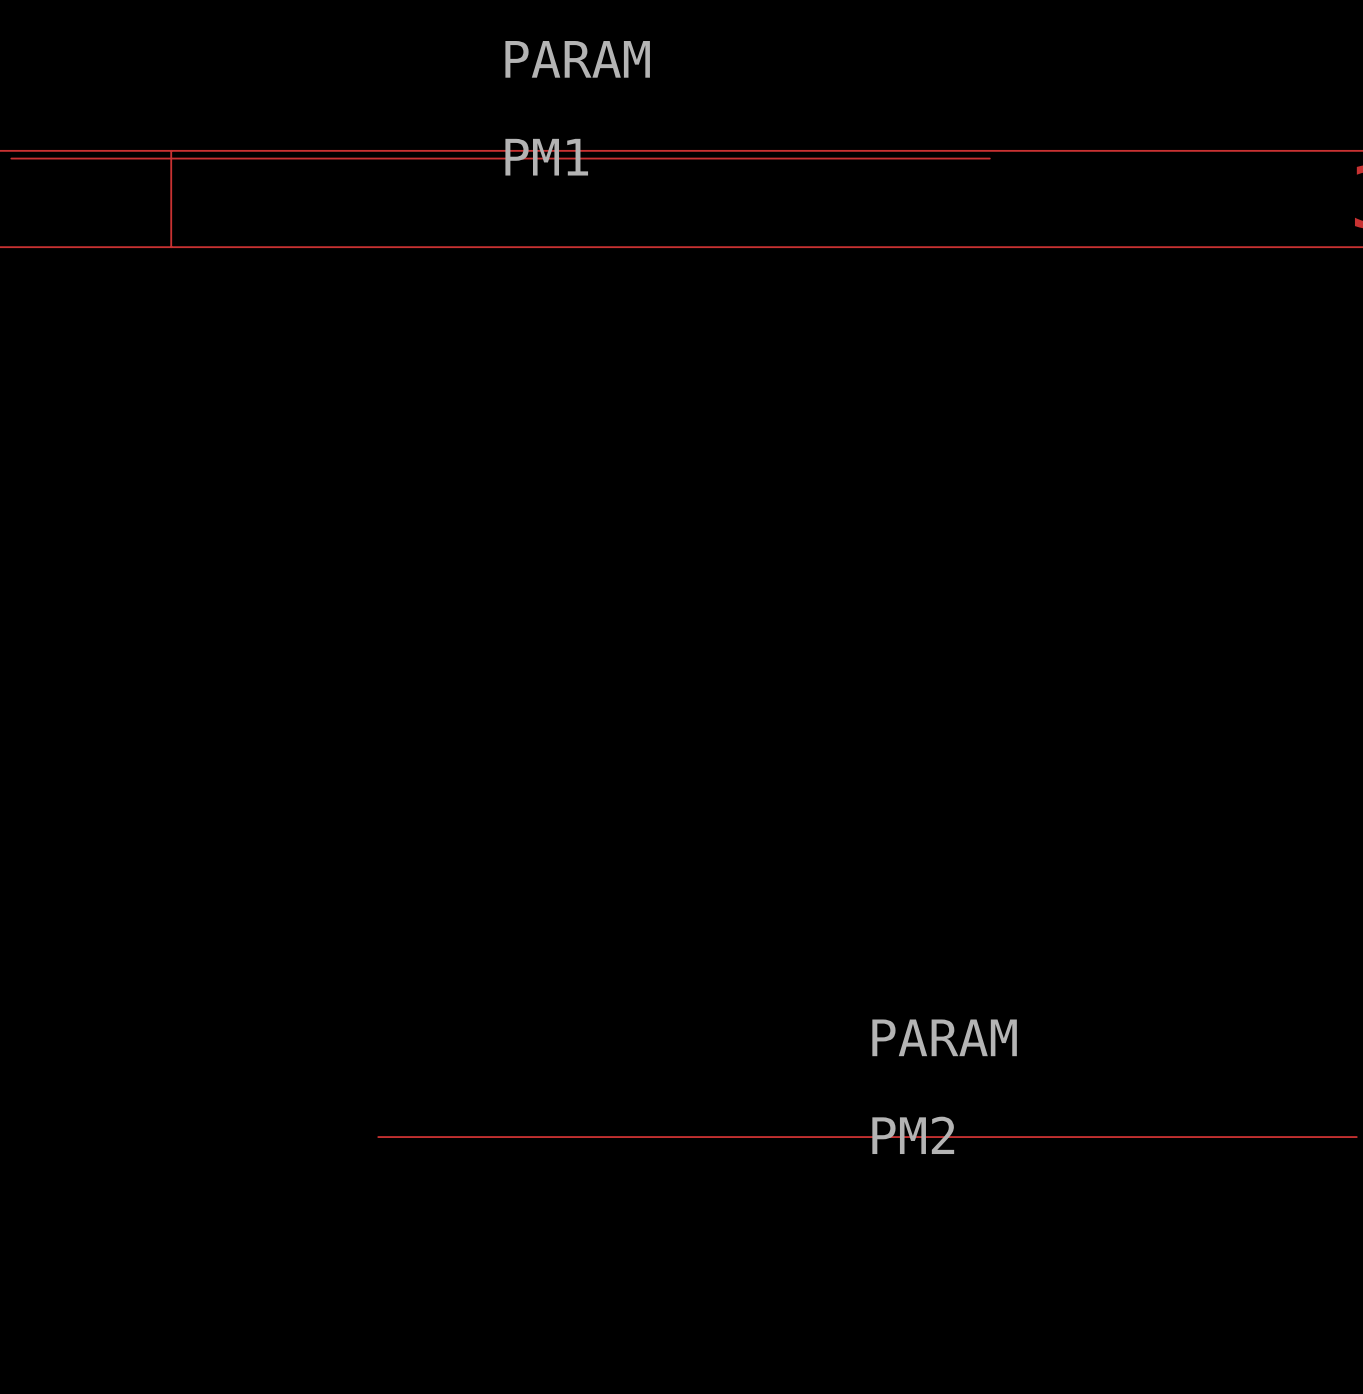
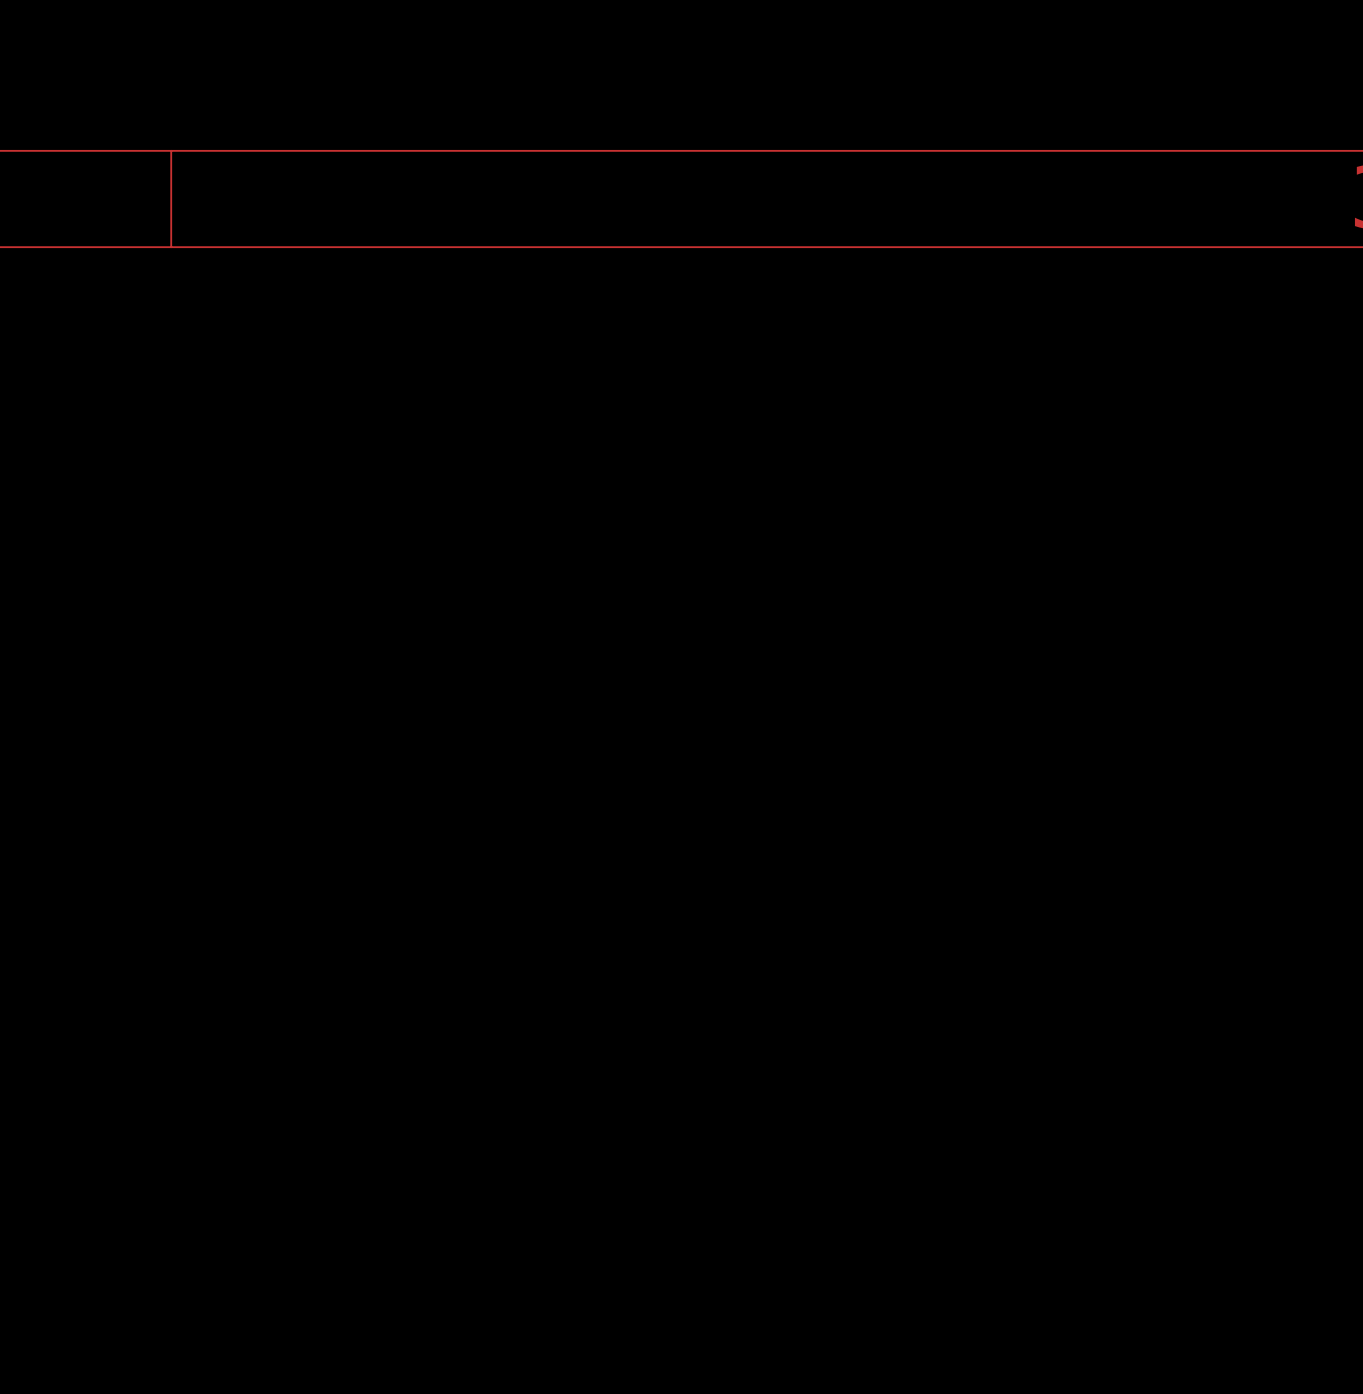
PM1: PARAM (500, 158) -> none
PM2: PARAM (867, 1137) -> none

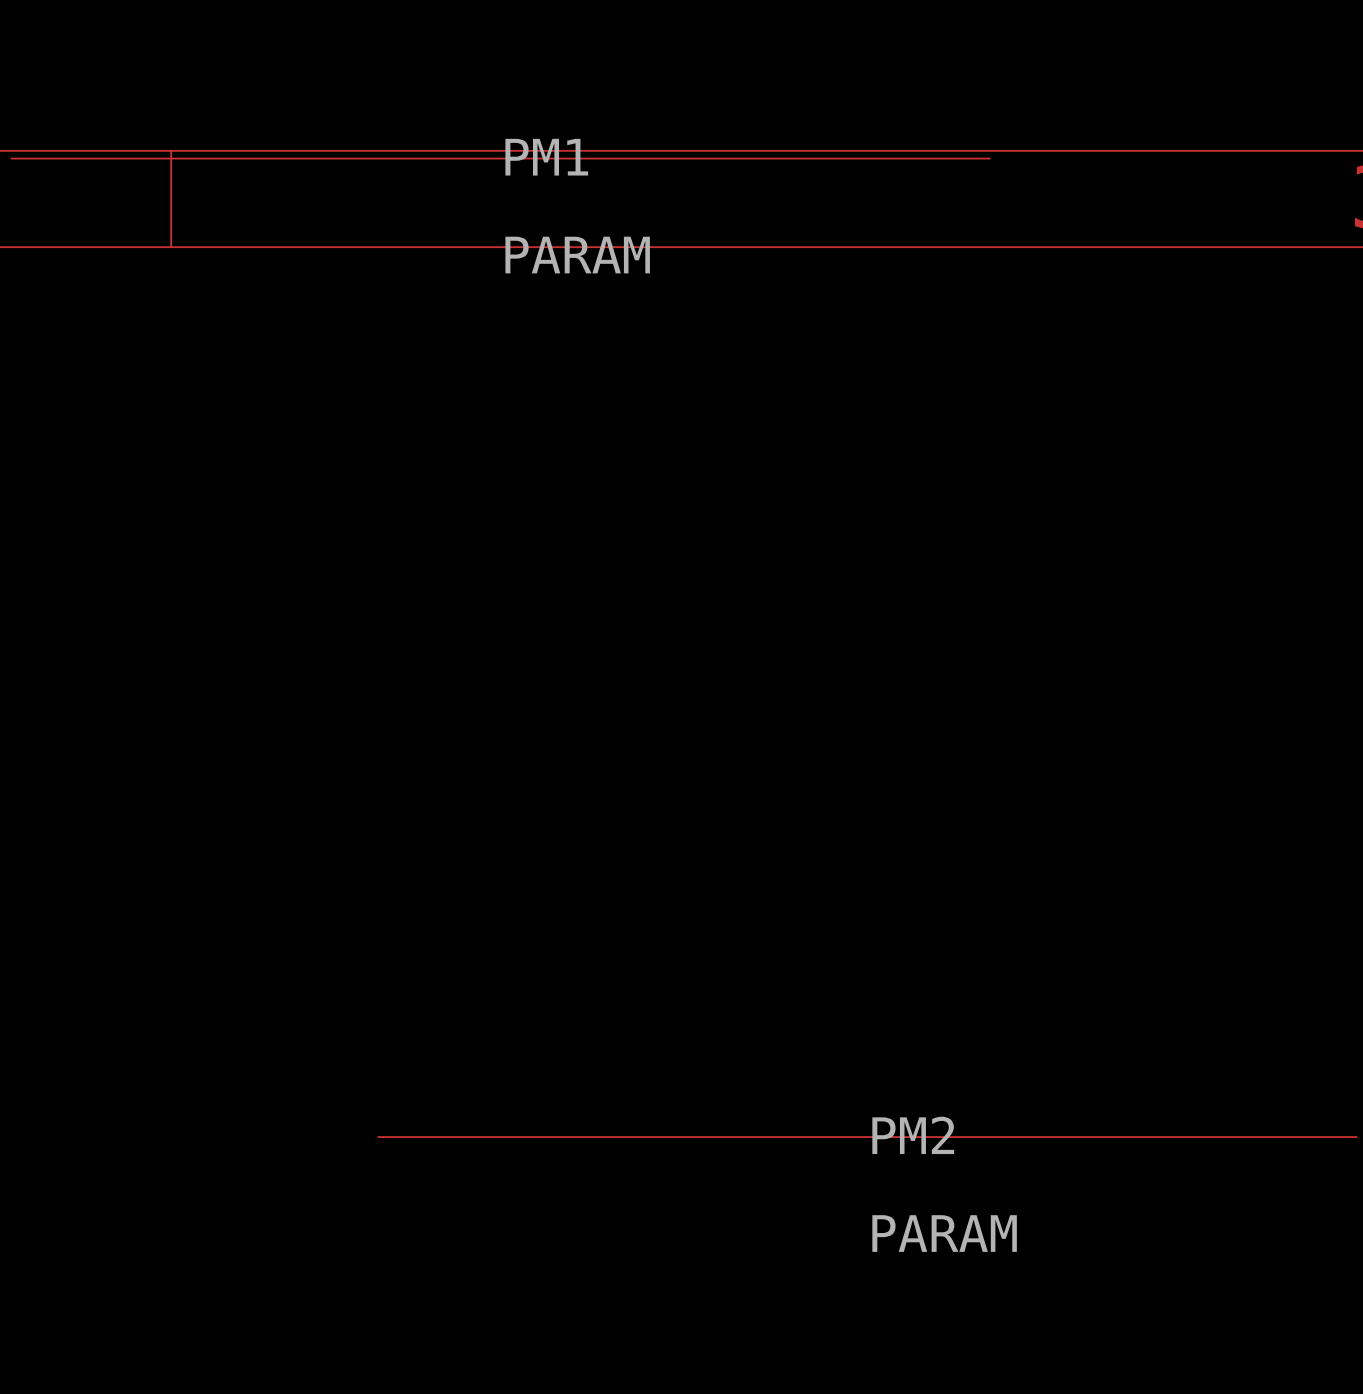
PM1: none -> PARAM (500, 158)
PM2: none -> PARAM (867, 1137)

